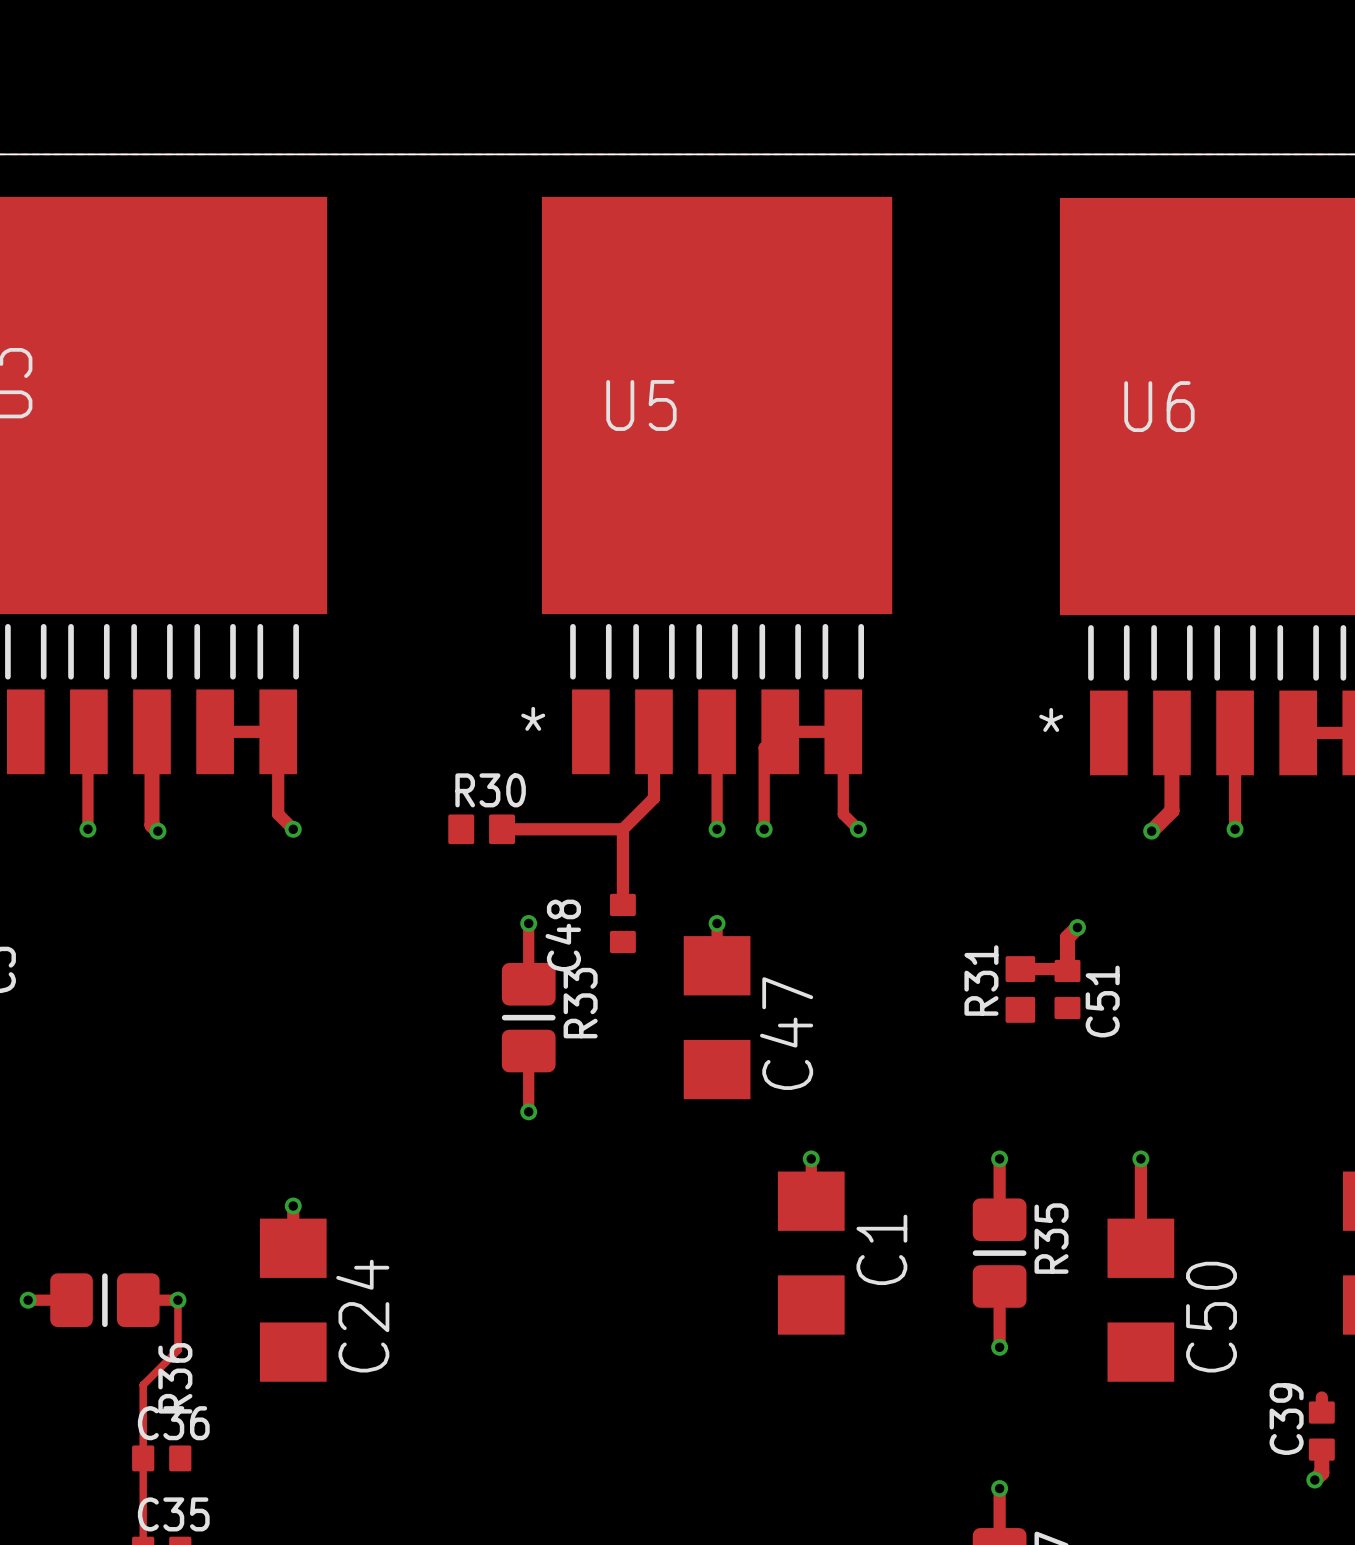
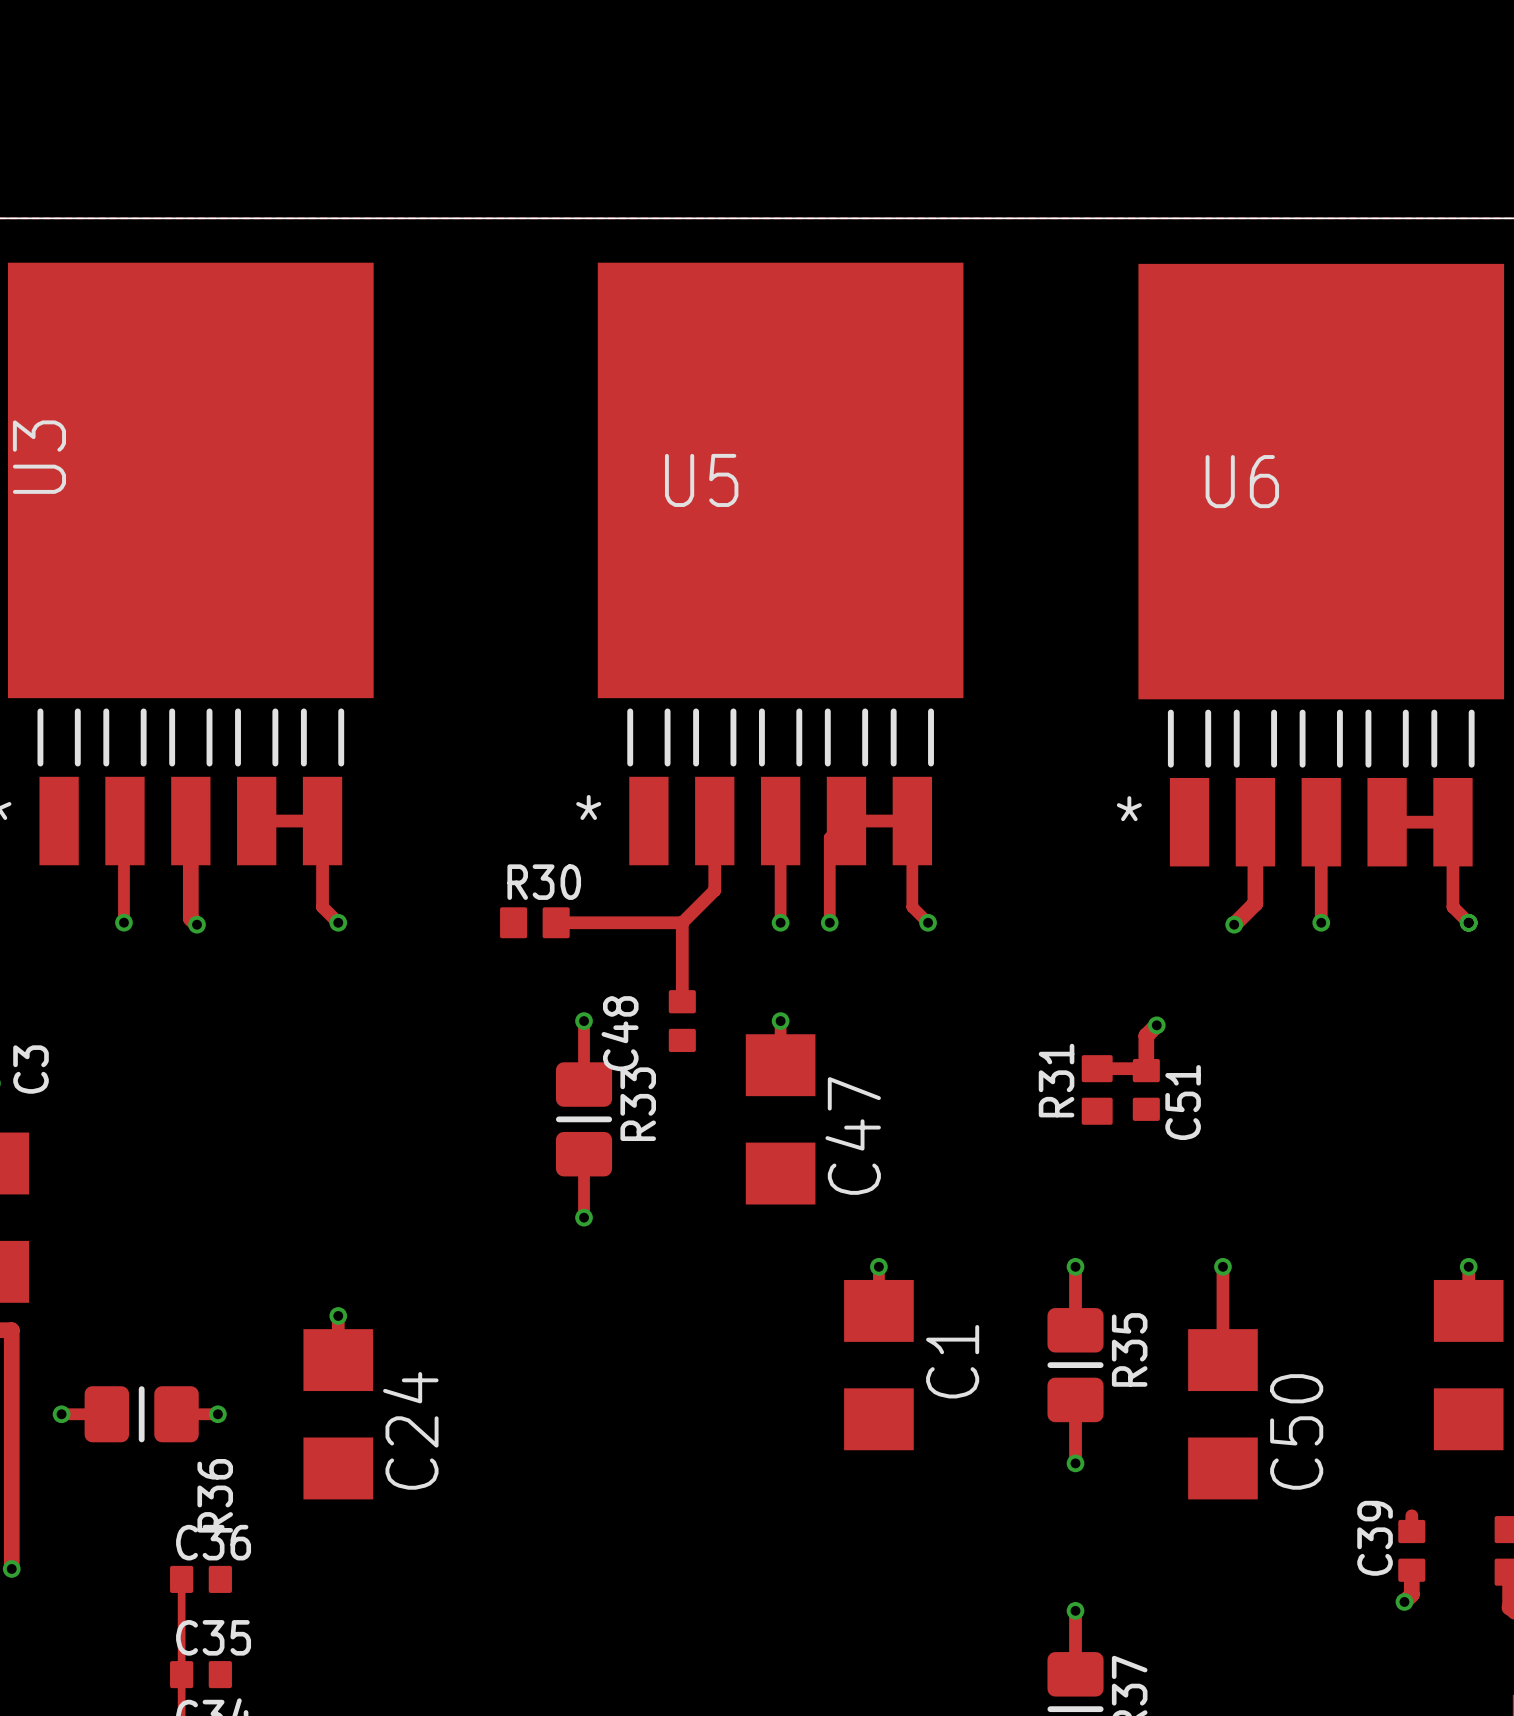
top track: (177, 1300) (177, 1350) (143, 1385) (143, 1458) -> none

